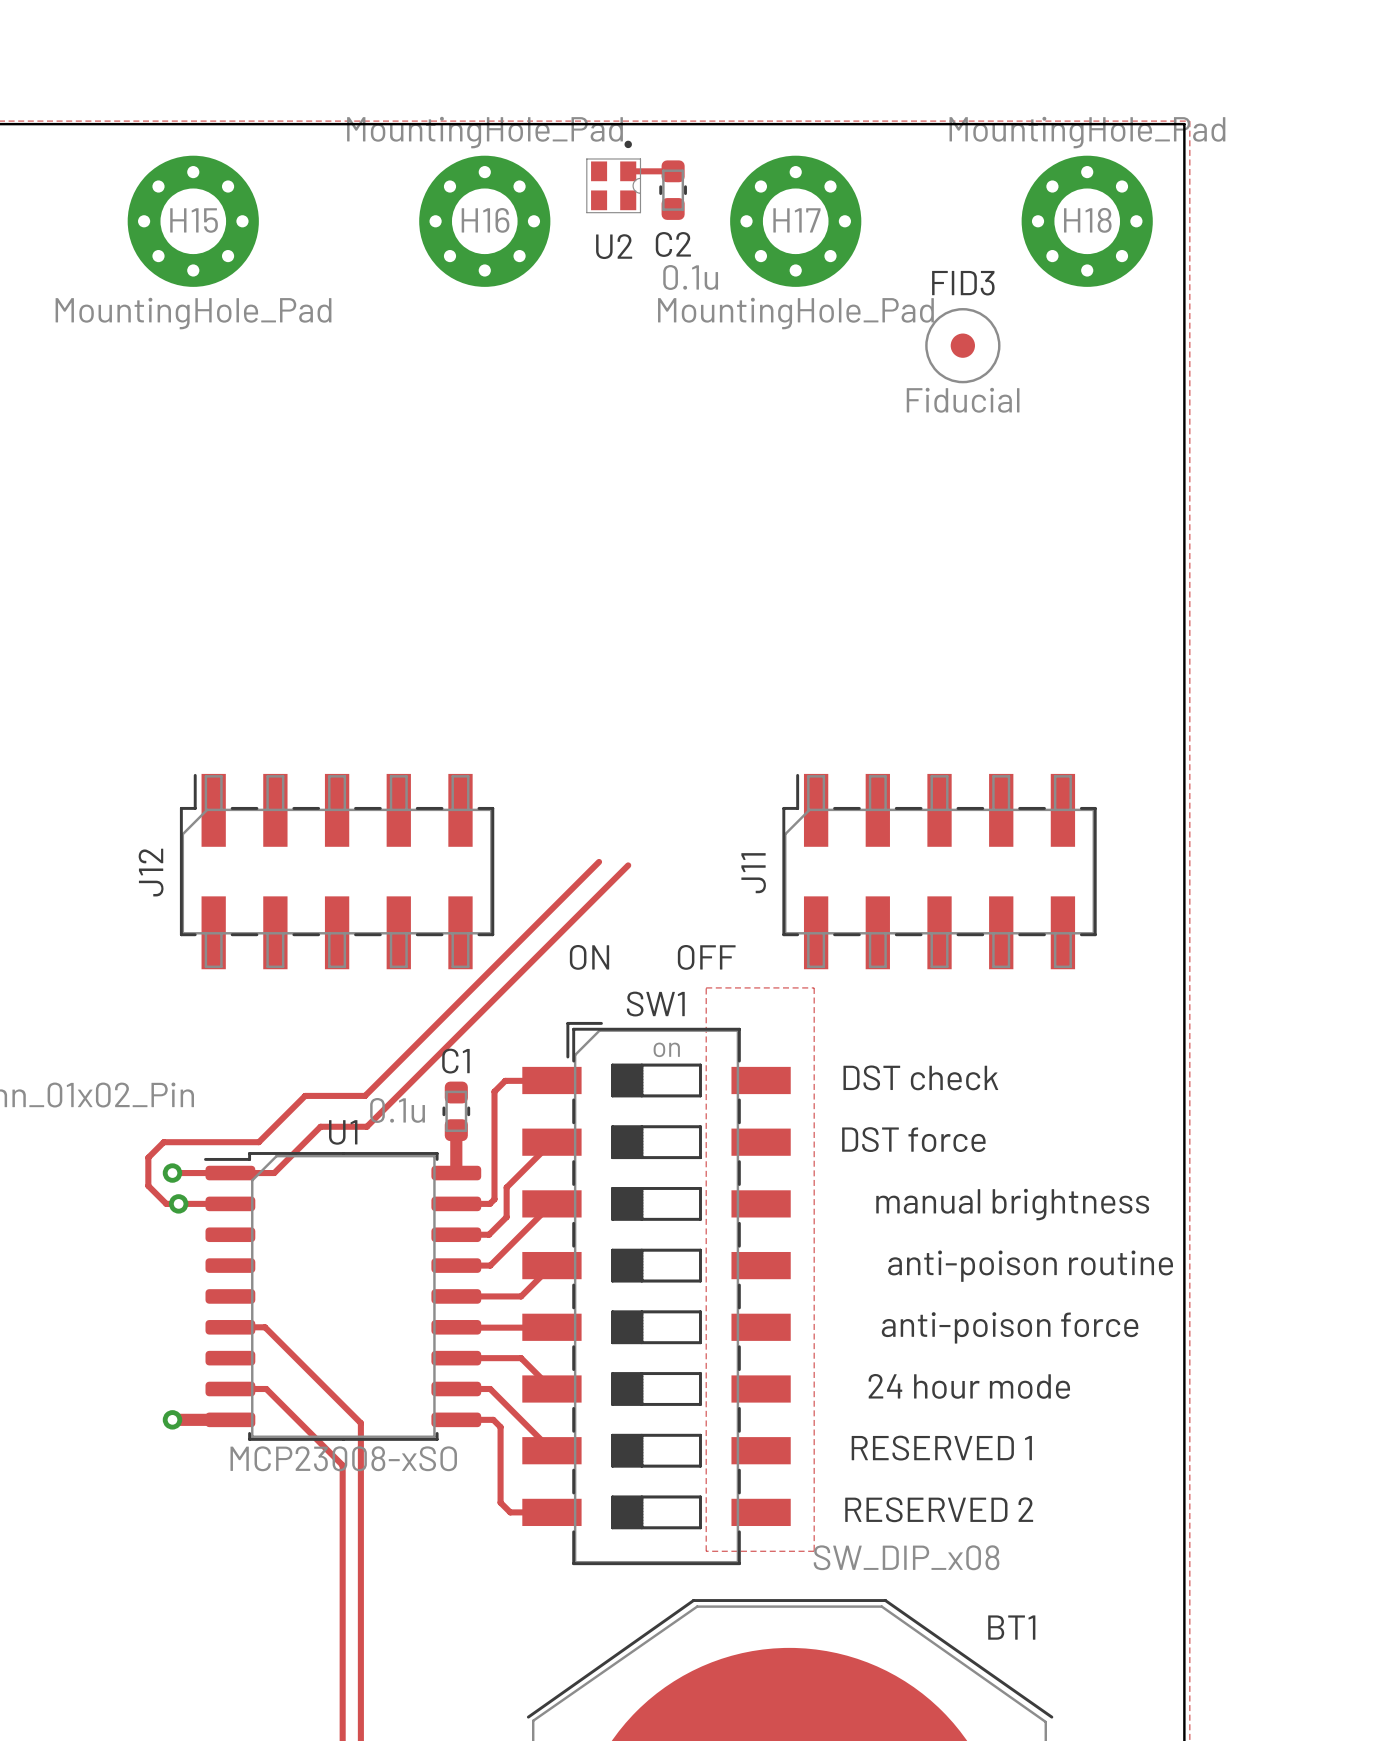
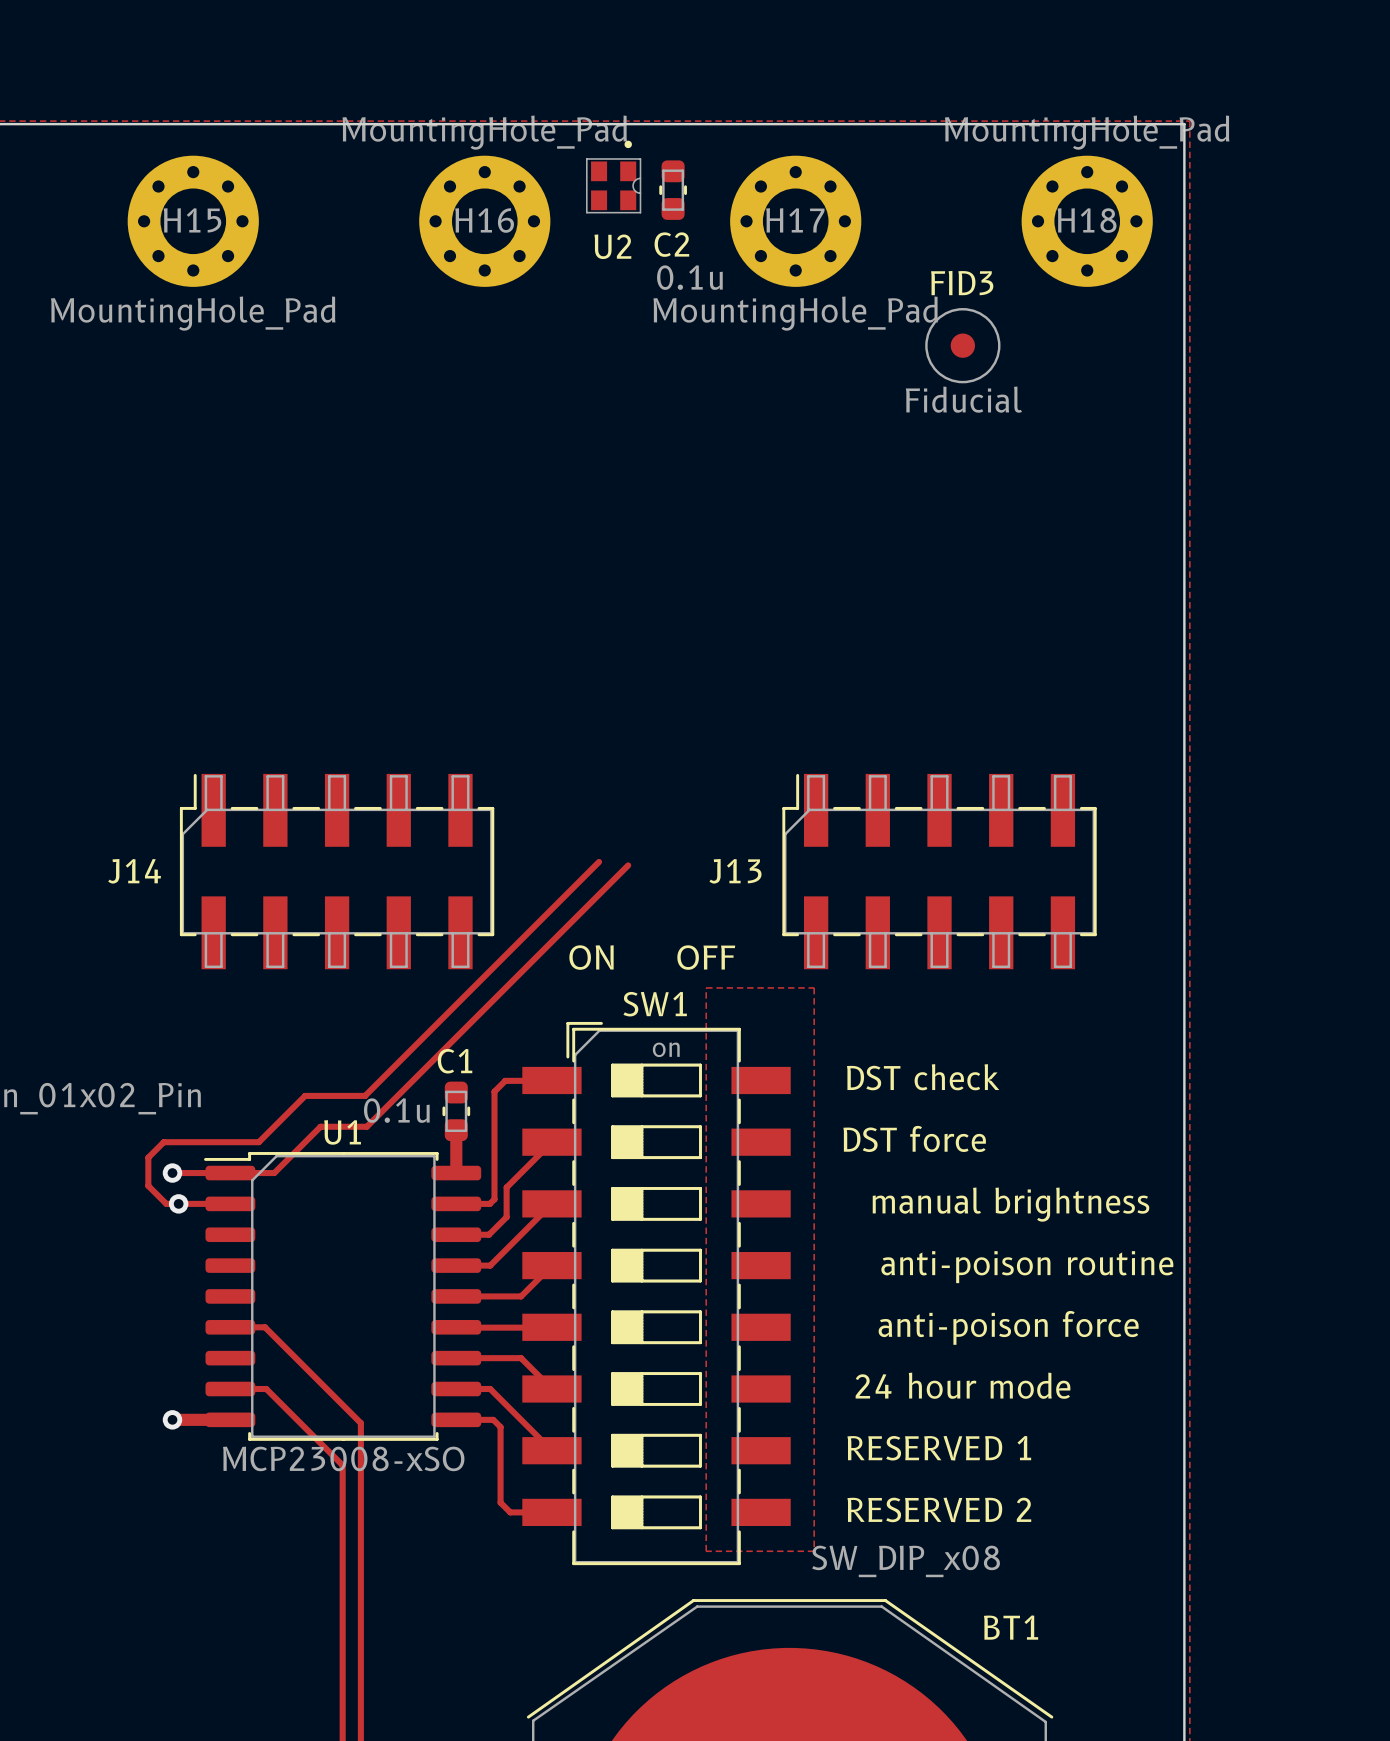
track: (628, 171) (673, 171) -> none
J12 name: J12 (151, 872) -> J14 (134, 871)
J11 name: J11 (753, 873) -> J13 (735, 871)

